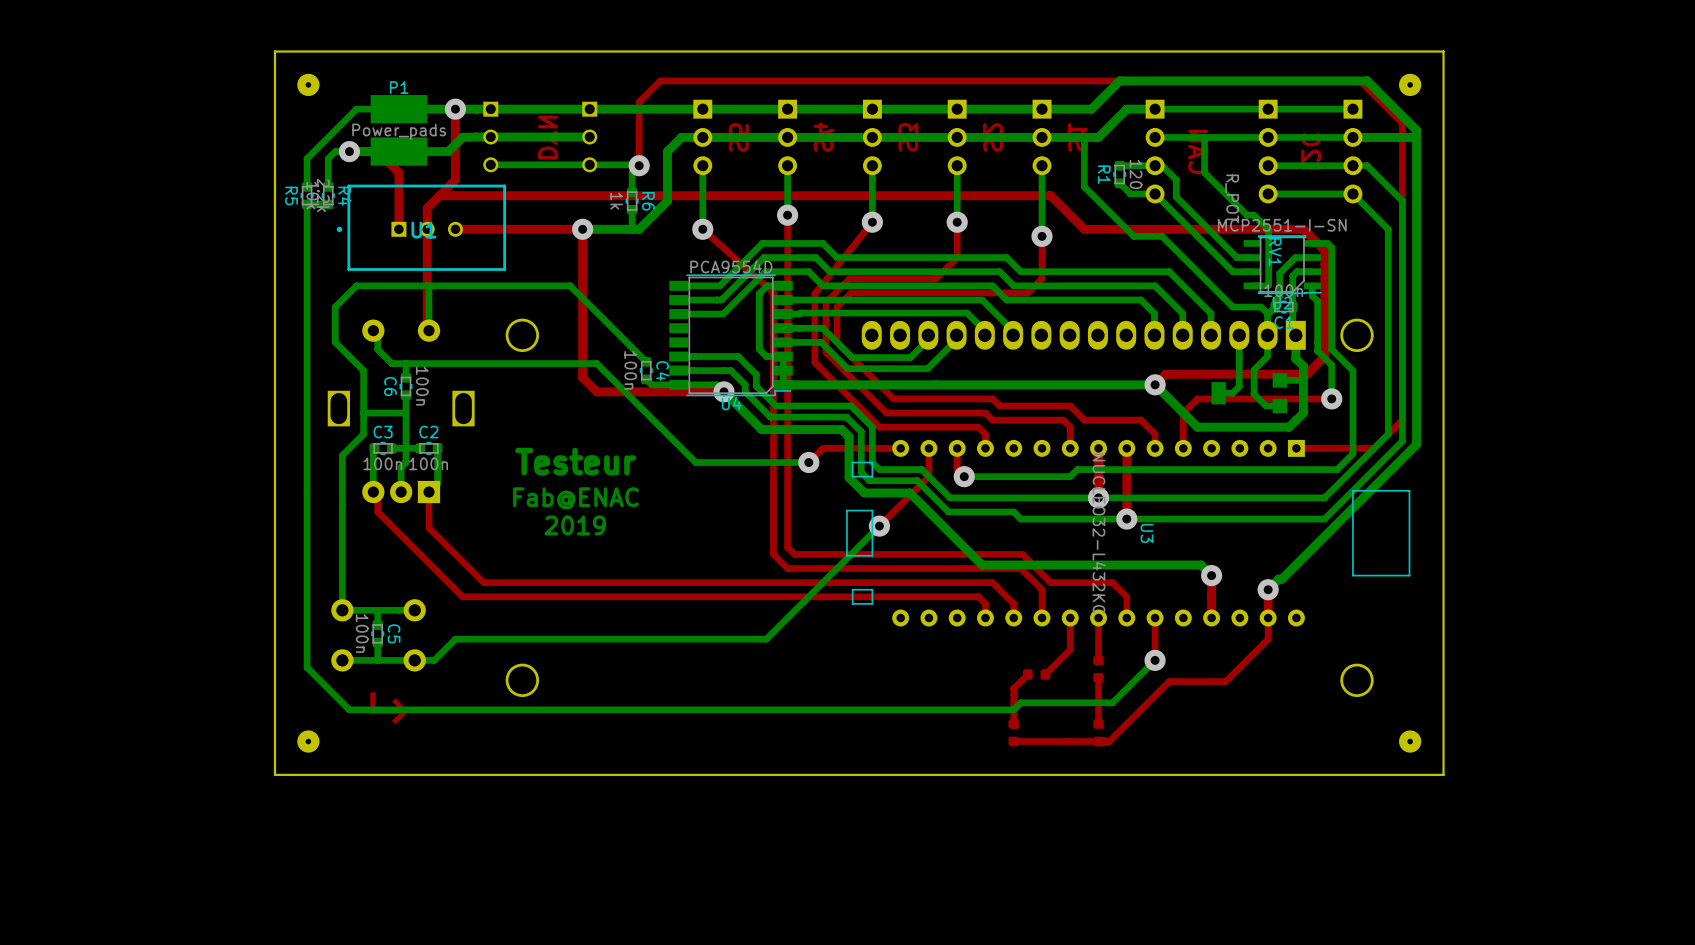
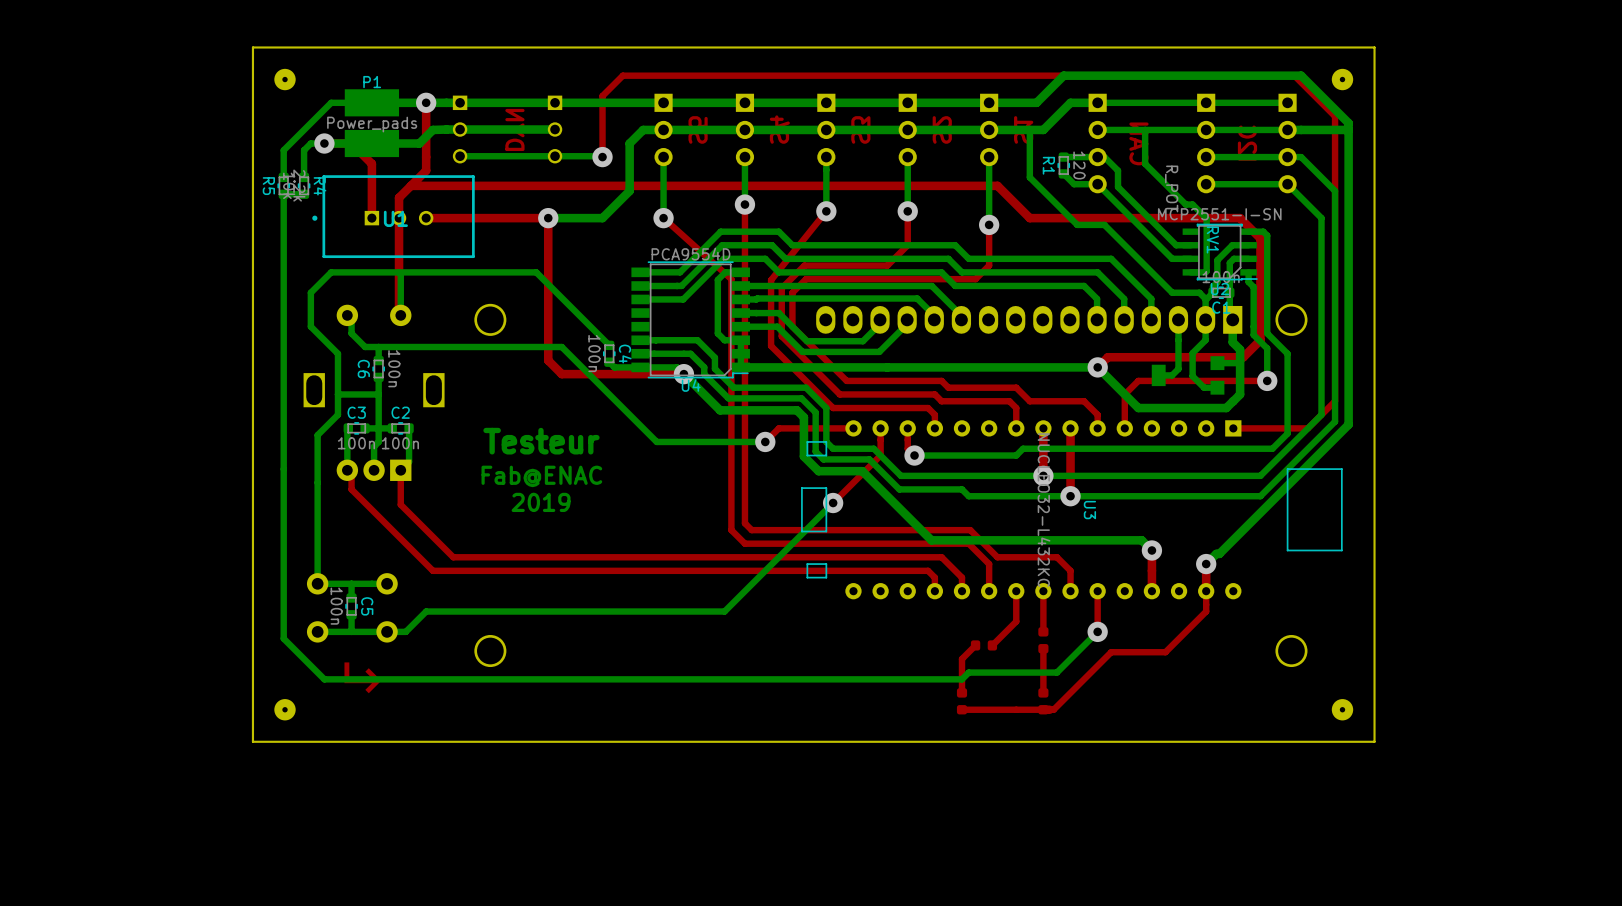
bottom track: (639, 165) (632, 172) (632, 192) -> none
R6: 1k (632, 201) -> none
bottom track: (632, 209) (632, 229) -> none

